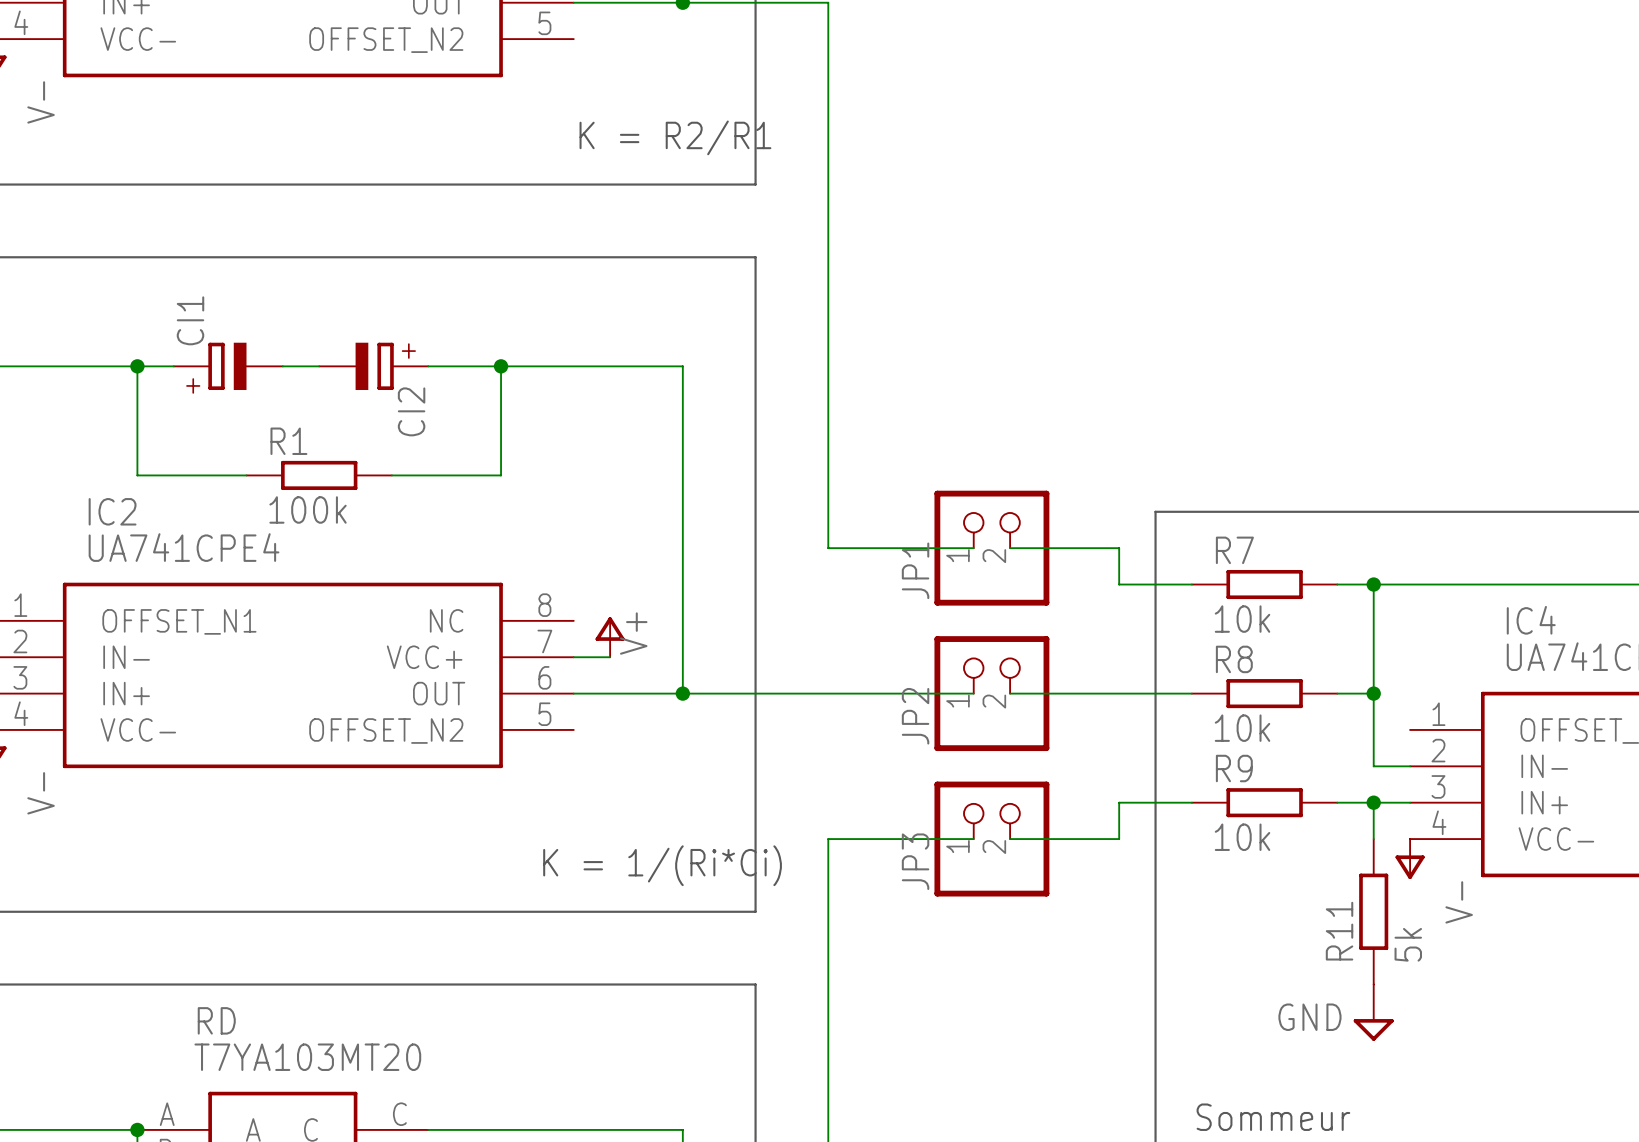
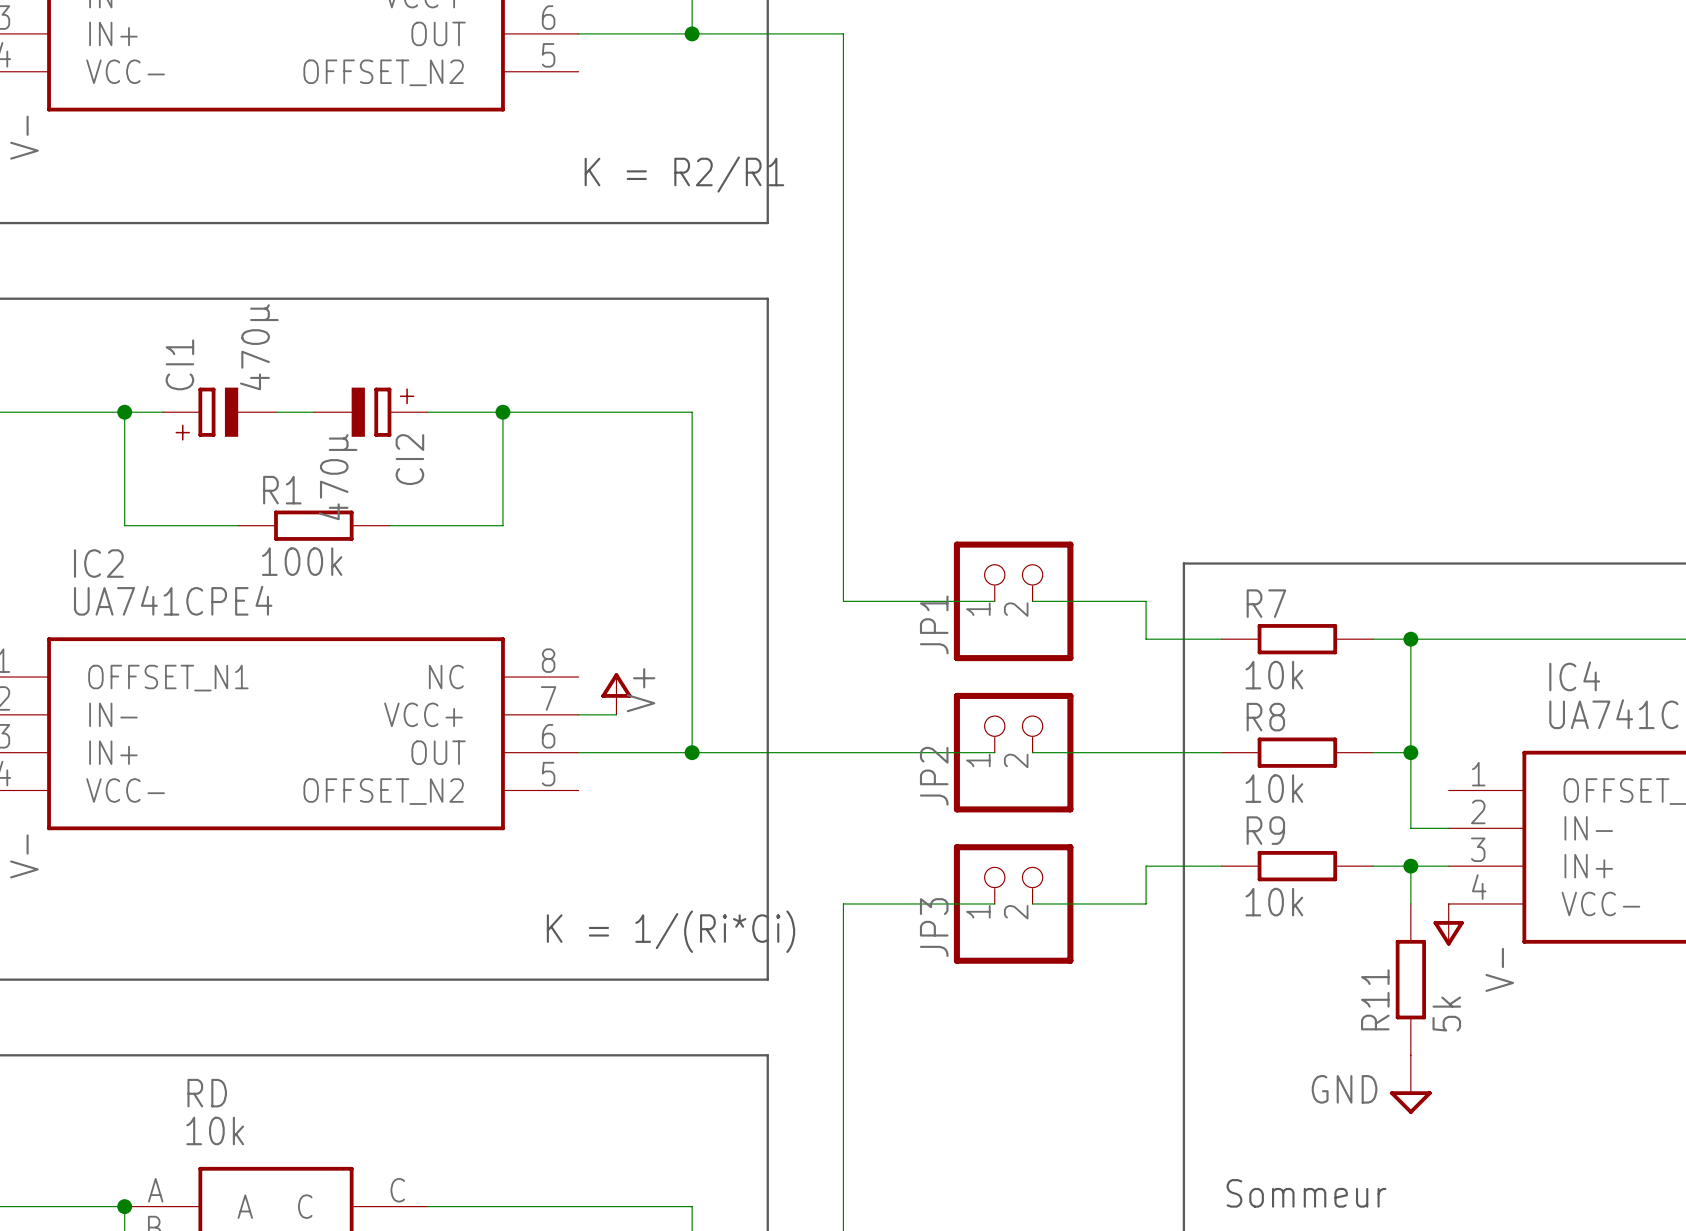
CI1 value: none -> 470µ (259, 347)
CI2 value: none -> 470µ (338, 477)
RD value: T7YA103MT20 (307, 1057) -> 10k (215, 1130)

